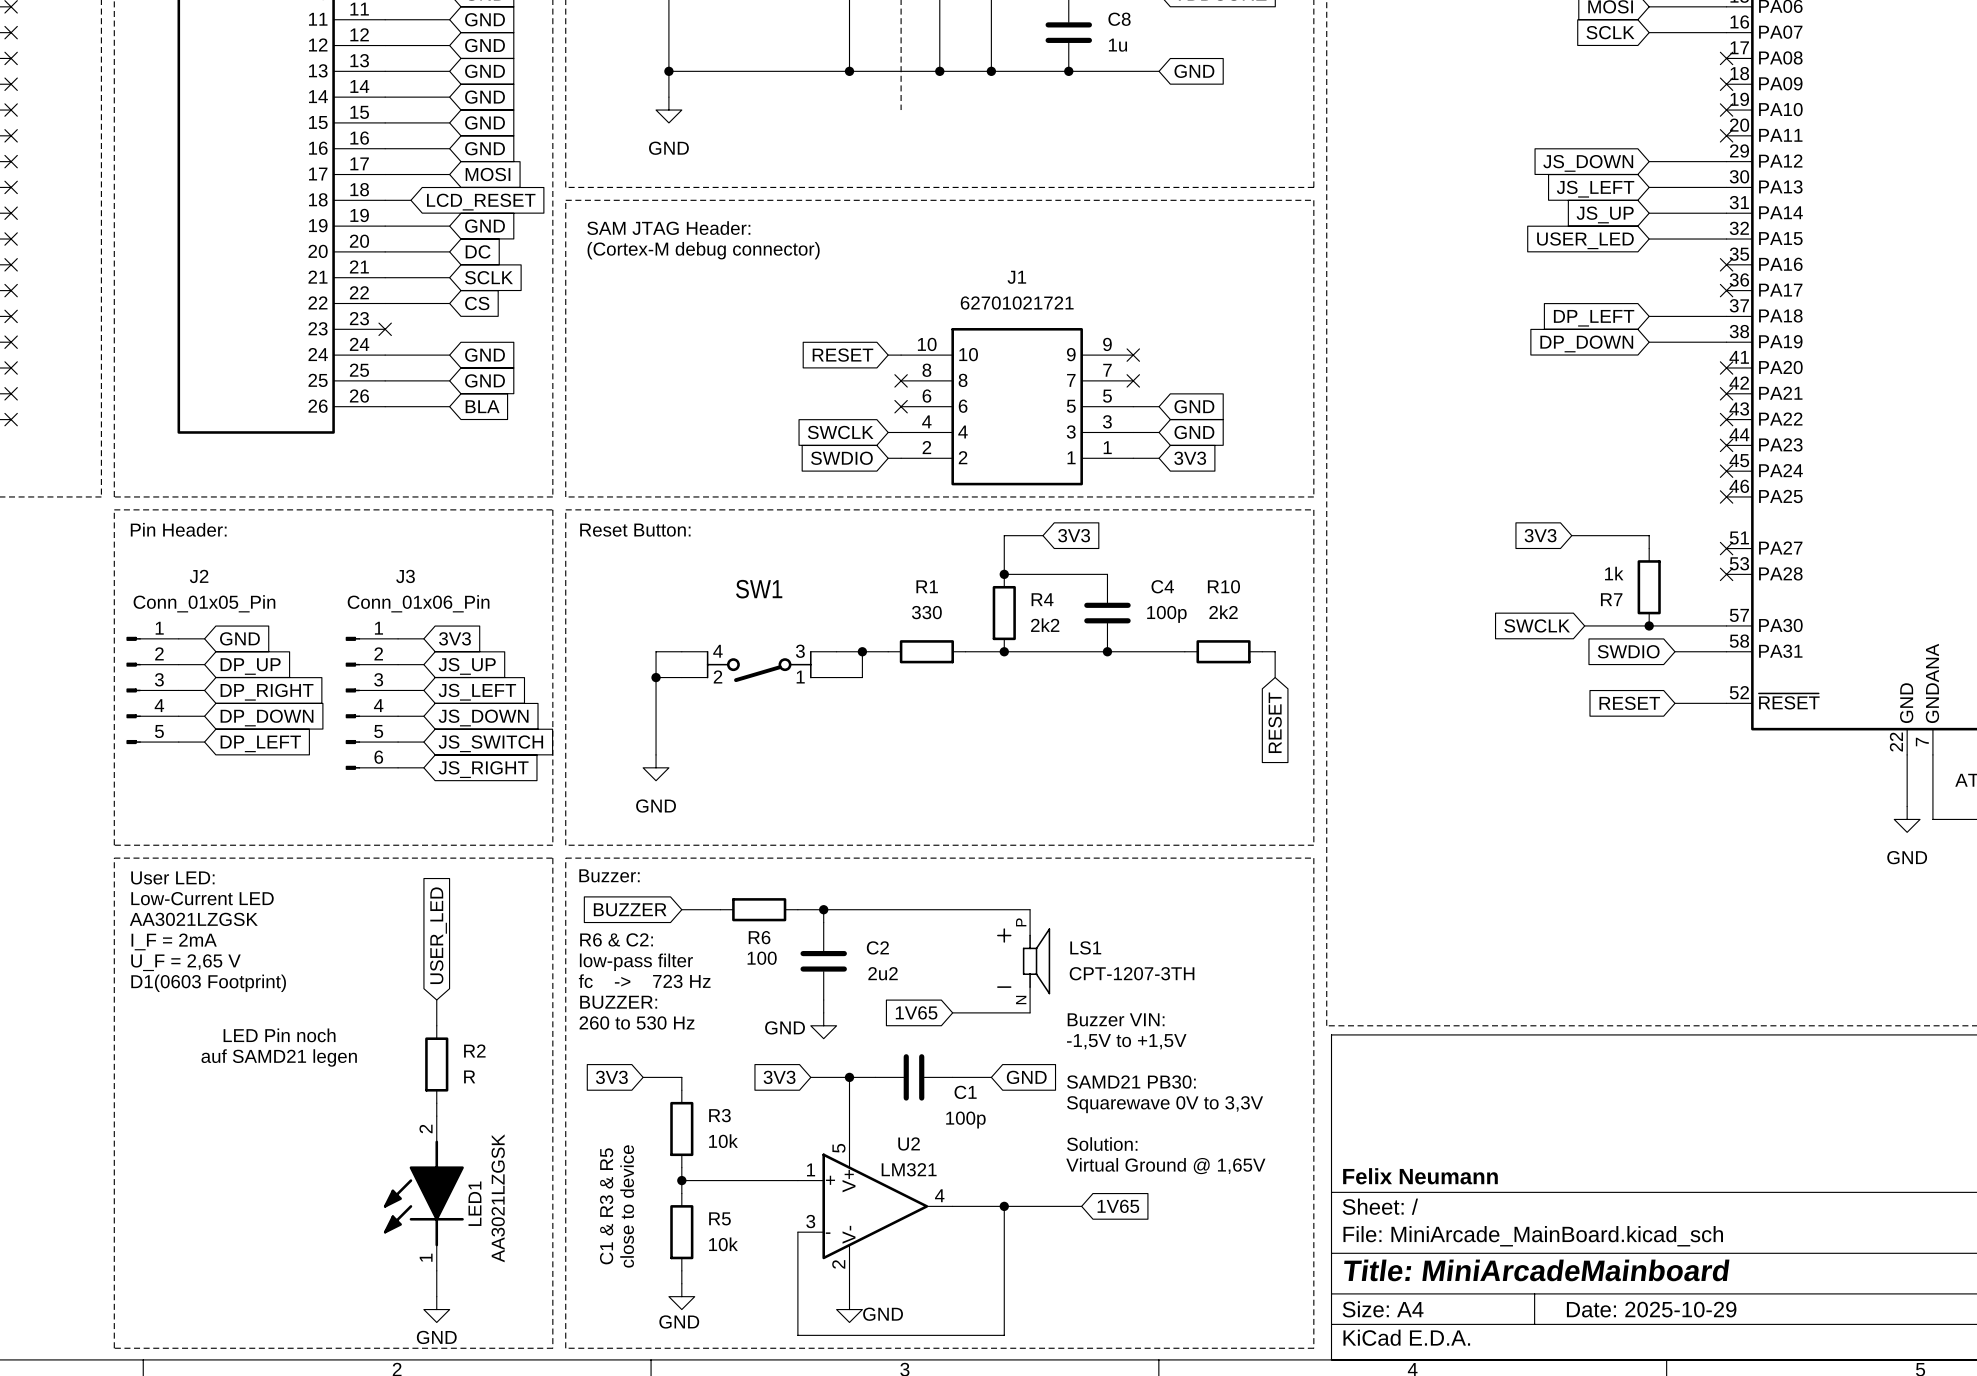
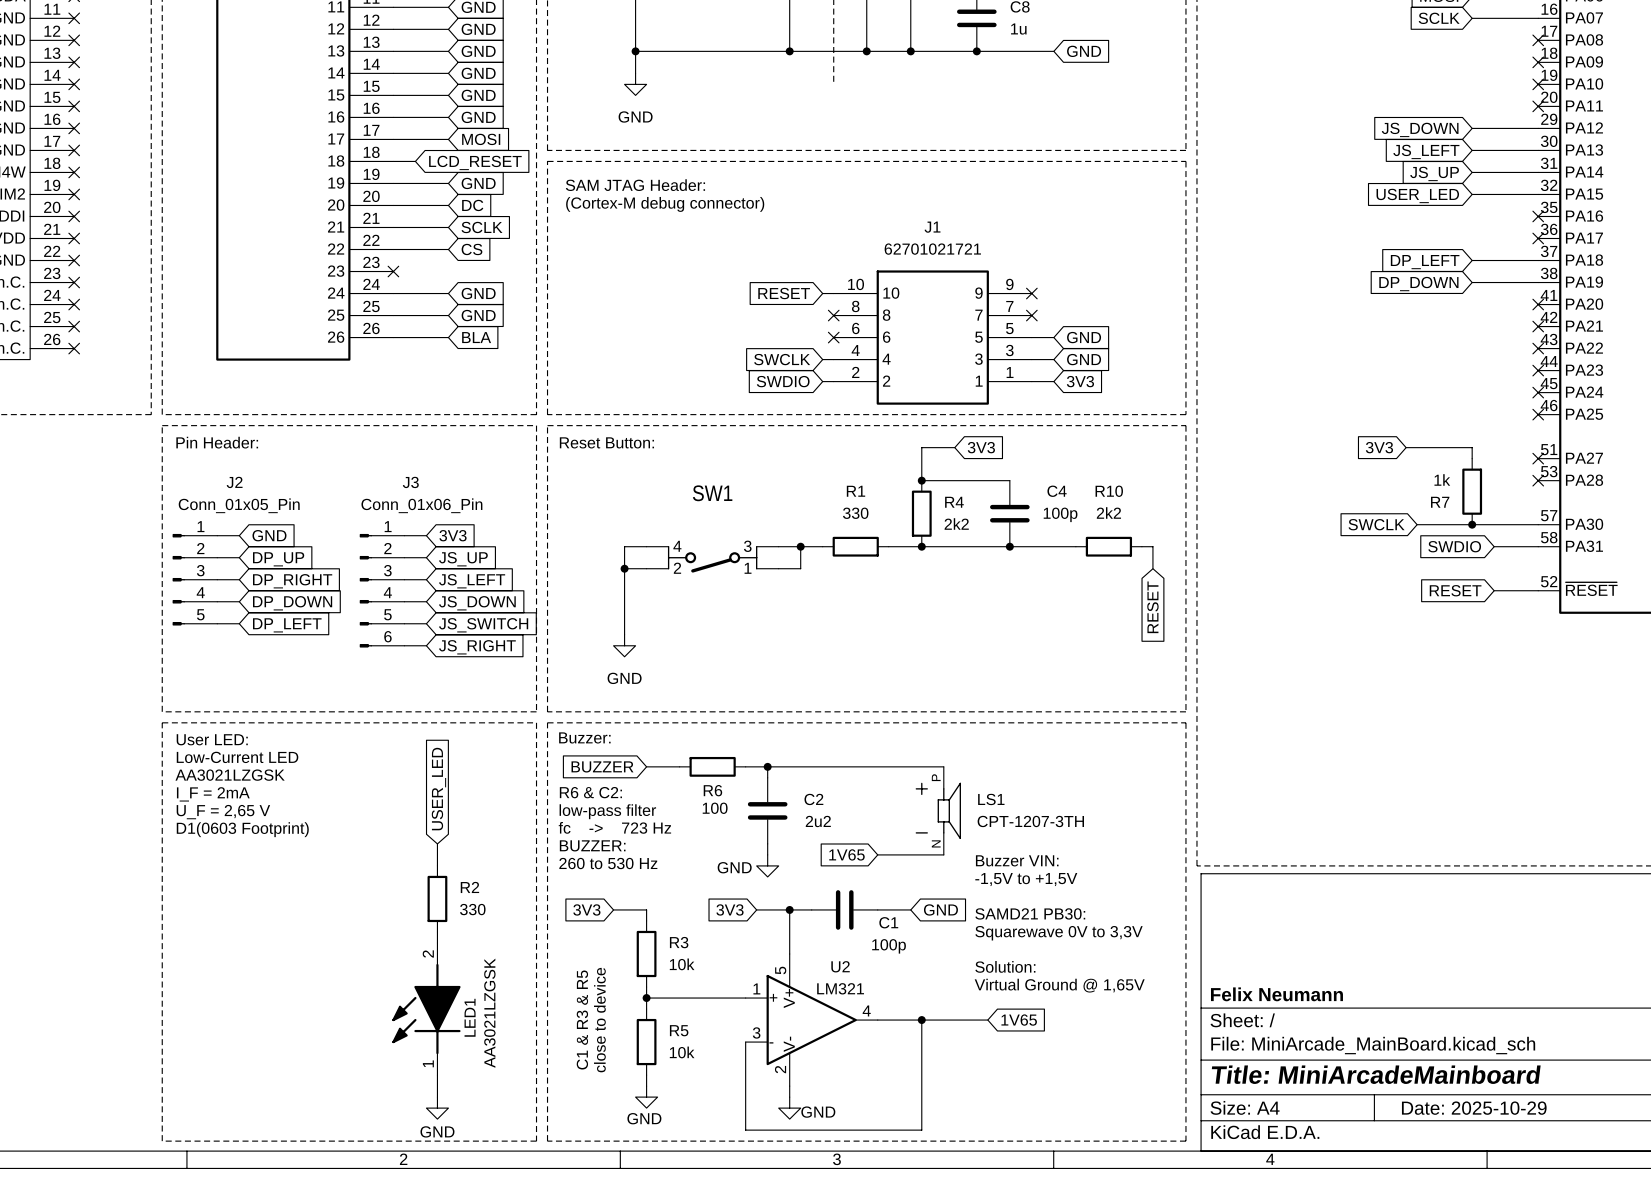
text: LED Pin noch (279, 1035) -> none
text: auf SAMD21 legen (279, 1057) -> none
R2 value: R (469, 1076) -> 330 (472, 909)

